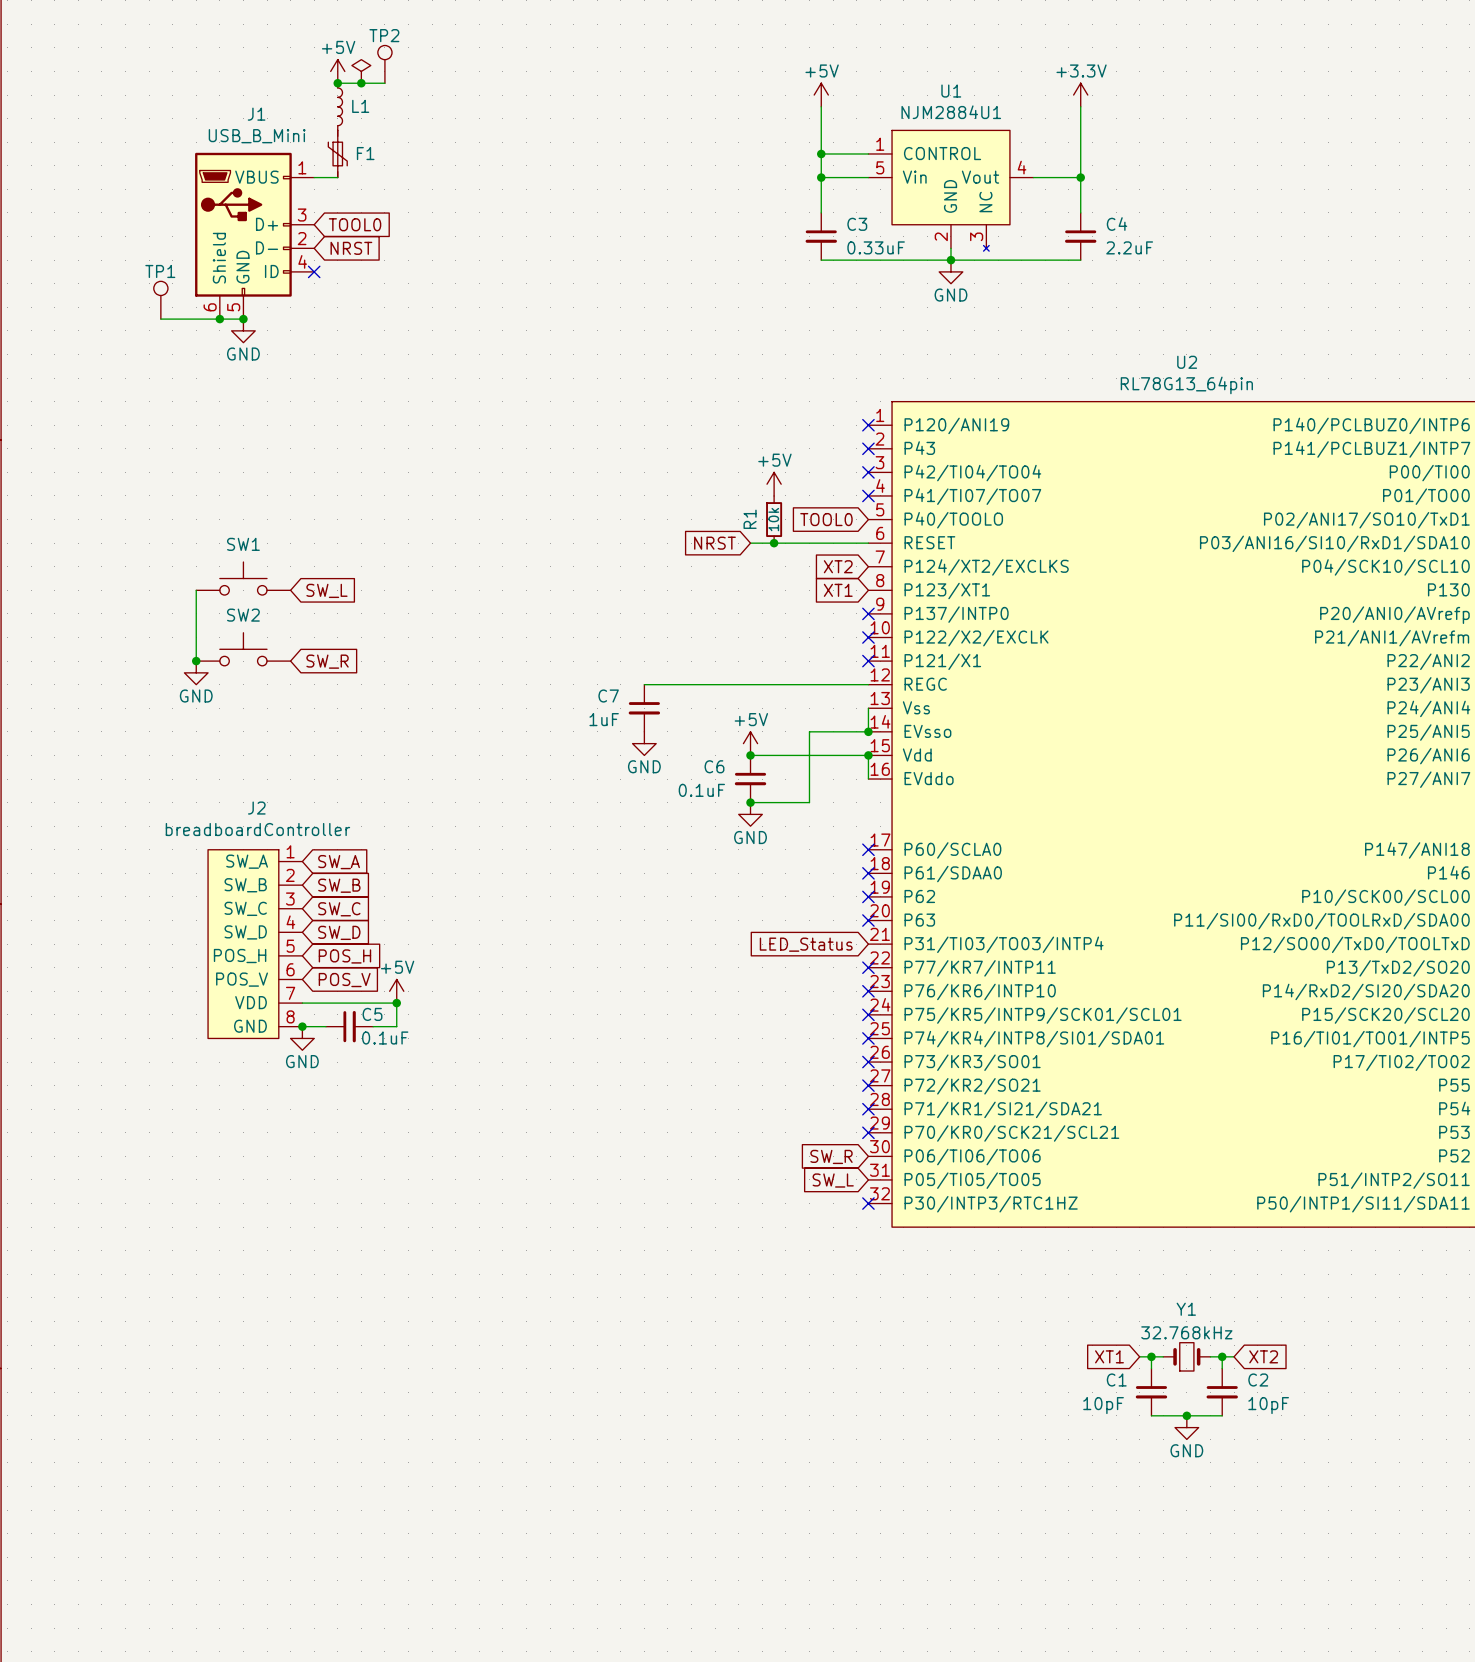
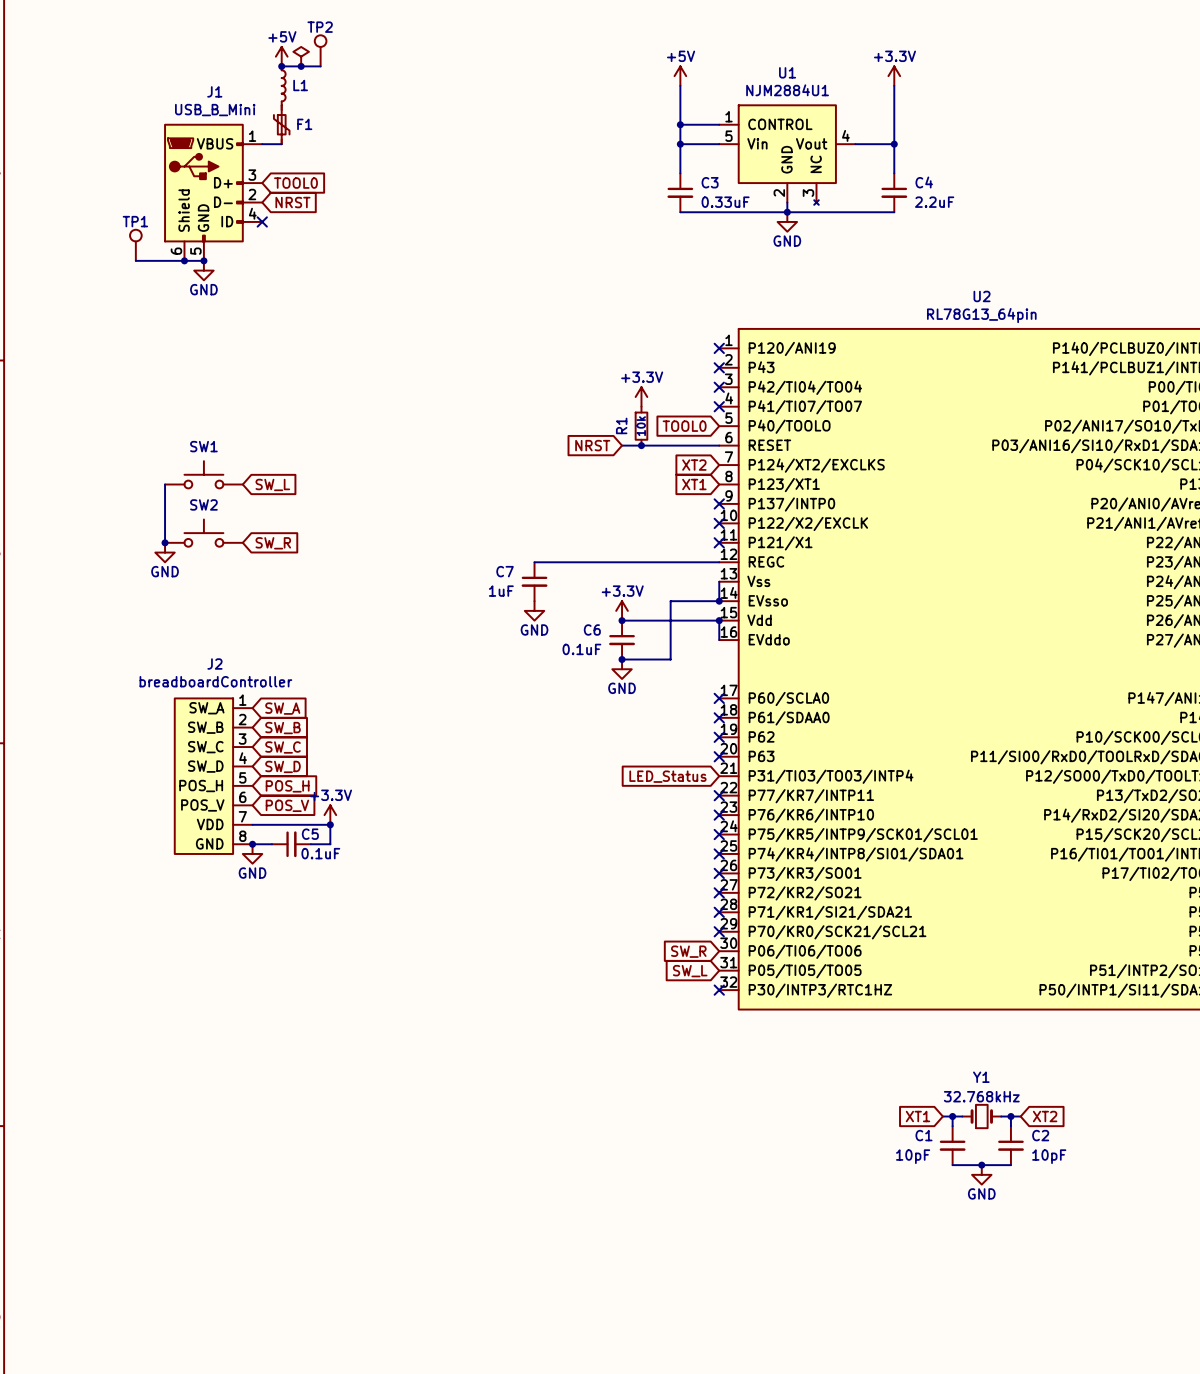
power symbol: +5V (774, 484) -> +3.3V (641, 396)
power symbol: +5V (750, 743) -> +3.3V (622, 610)
power symbol: +5V (396, 991) -> +3.3V (330, 815)

